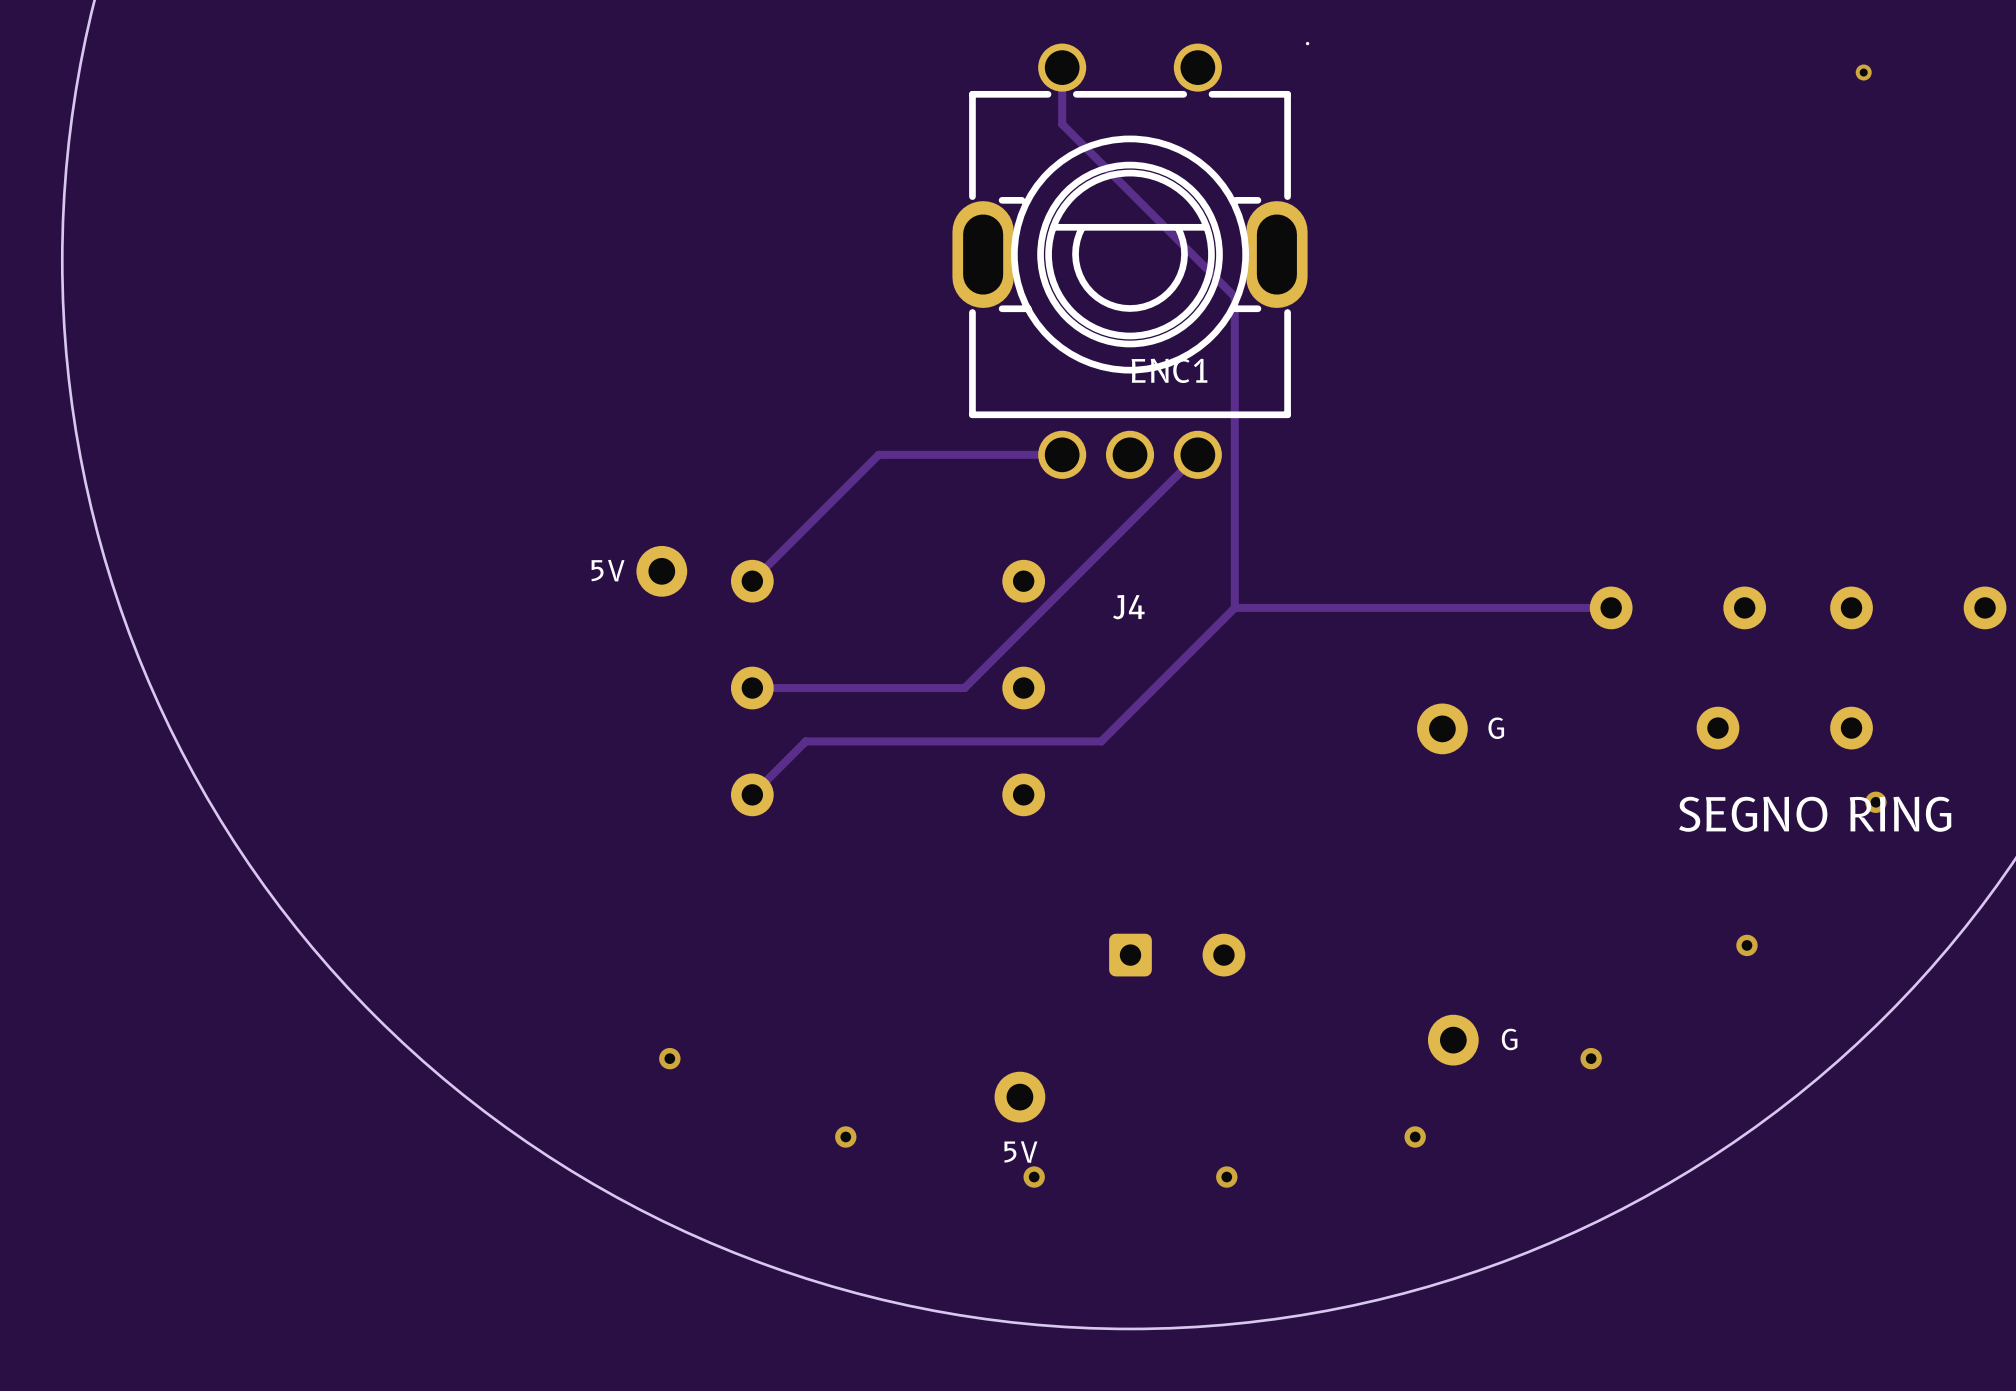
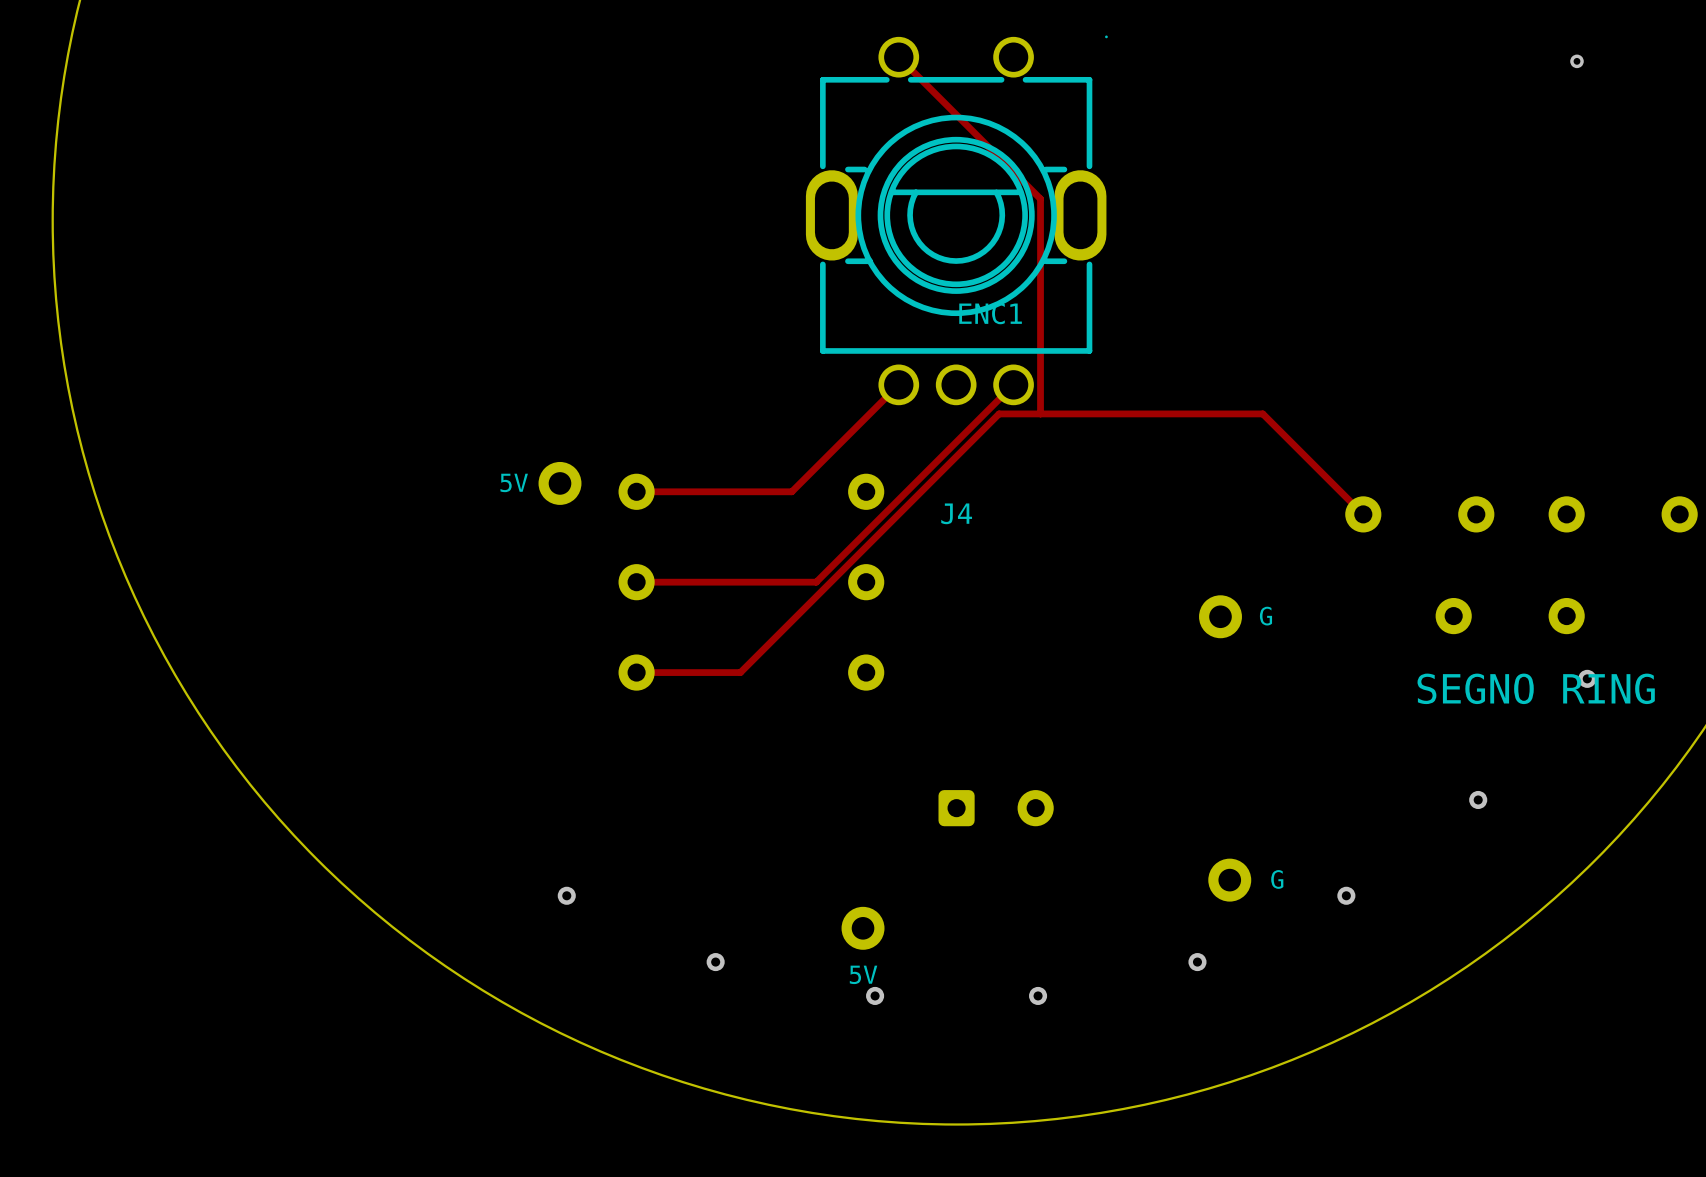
track: (1062, 67) (1062, 124) (1234, 296) (1234, 607) -> (898, 57) (1040, 198) (1040, 413)
track: (1062, 454) (878, 454) (752, 581) -> (898, 384) (791, 491) (636, 491)
track: (1234, 607) (1101, 741) (805, 741) (752, 794) -> (1363, 514) (1262, 413) (999, 413) (740, 672) (636, 672)
track: (1234, 607) (1611, 607) -> none

